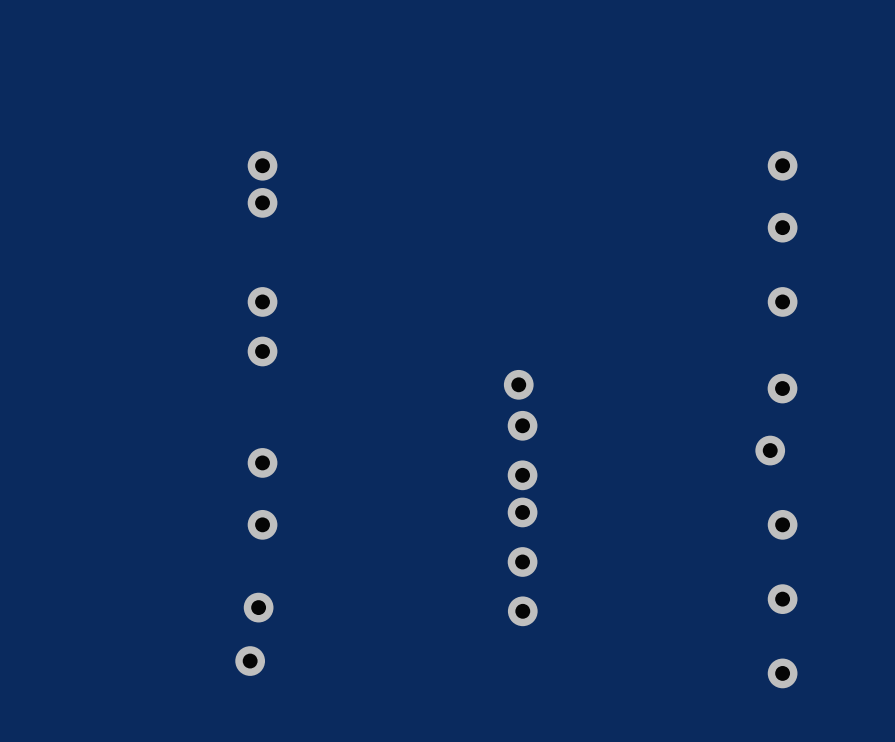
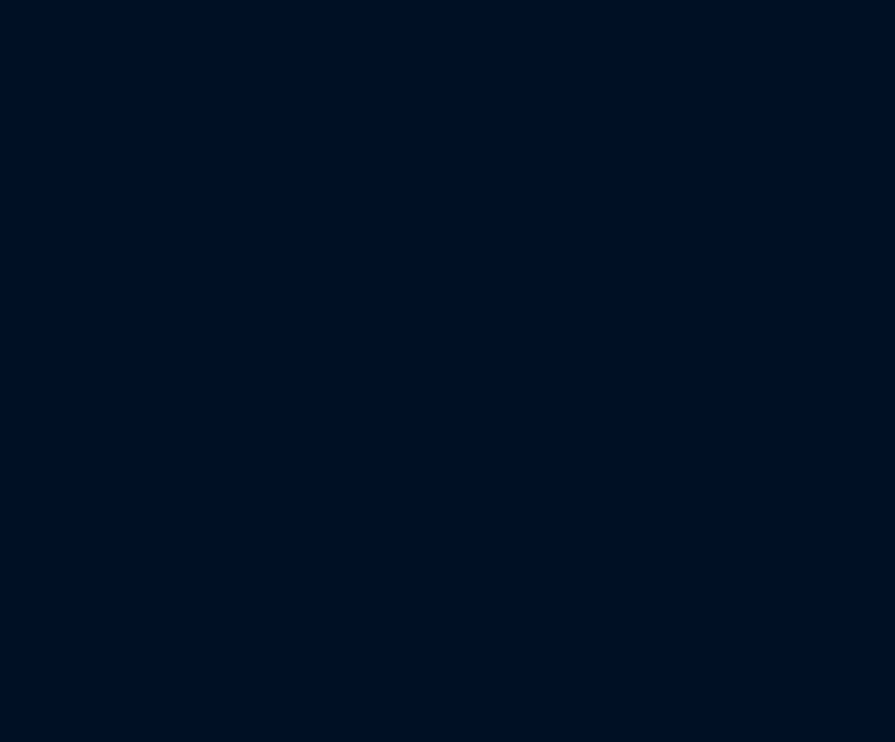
via: (262, 165) -> none
via: (782, 165) -> none
via: (262, 202) -> none
via: (782, 227) -> none
via: (262, 301) -> none
via: (782, 301) -> none
via: (262, 351) -> none
via: (518, 384) -> none
via: (782, 388) -> none
via: (522, 425) -> none
via: (770, 450) -> none
via: (262, 462) -> none
via: (522, 475) -> none
via: (522, 512) -> none
via: (262, 524) -> none
via: (782, 524) -> none
via: (522, 561) -> none
via: (782, 599) -> none
via: (258, 607) -> none
via: (522, 611) -> none
via: (250, 661) -> none
via: (782, 673) -> none

